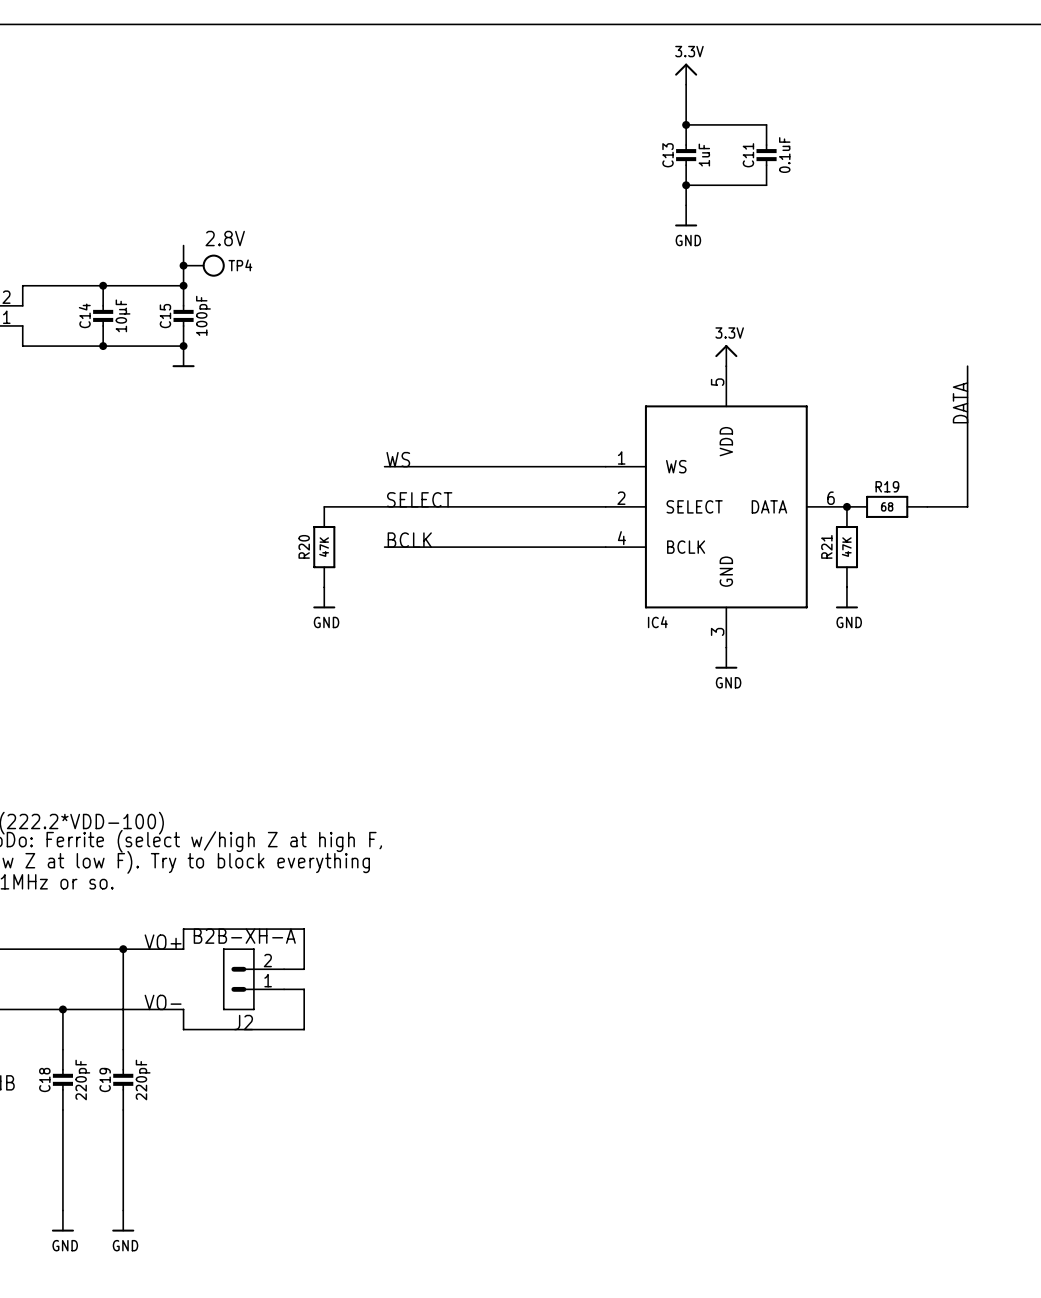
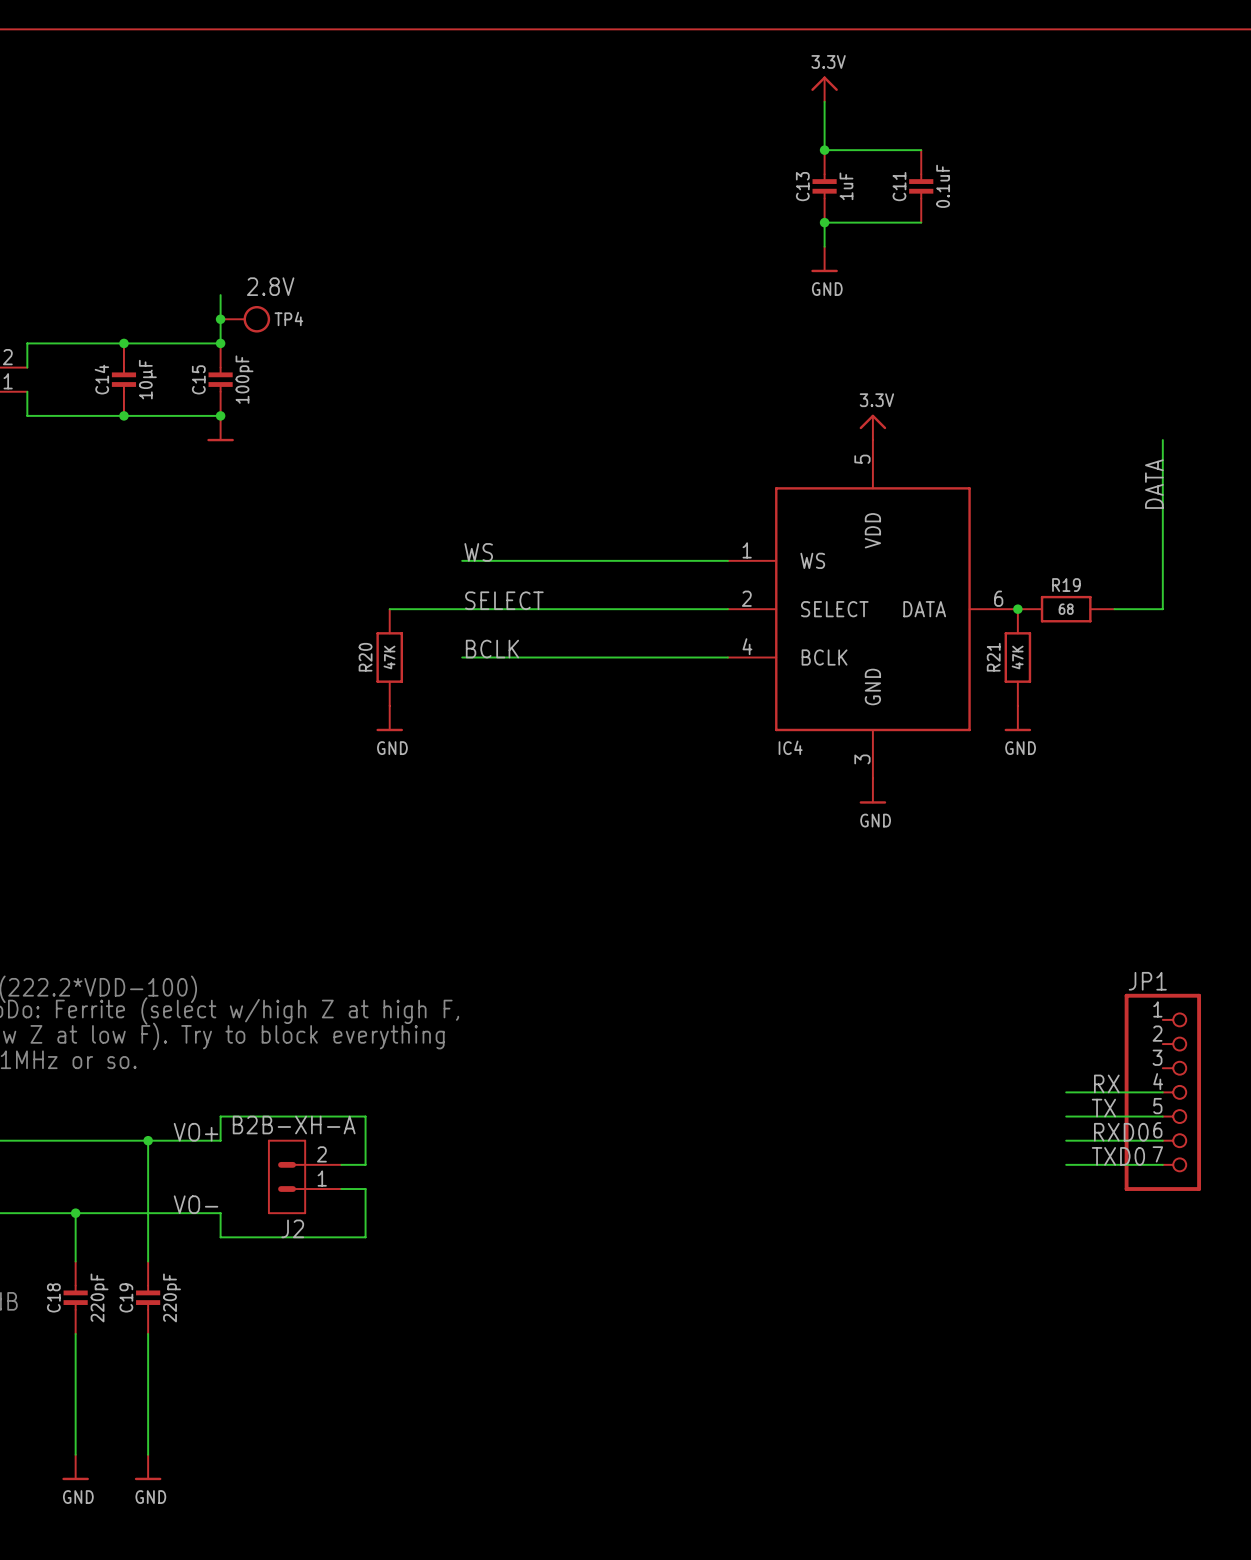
label: none -> RX (1106, 1083)
wire: none -> (1066, 1092) (1162, 1092)
JP1: none -> (1162, 1092)
label: none -> TX (1103, 1108)
wire: none -> (1066, 1116) (1162, 1116)
label: none -> RXD0 (1121, 1132)
wire: none -> (1066, 1140) (1162, 1140)
label: none -> TXD0 (1118, 1156)
wire: none -> (1066, 1164) (1162, 1164)

